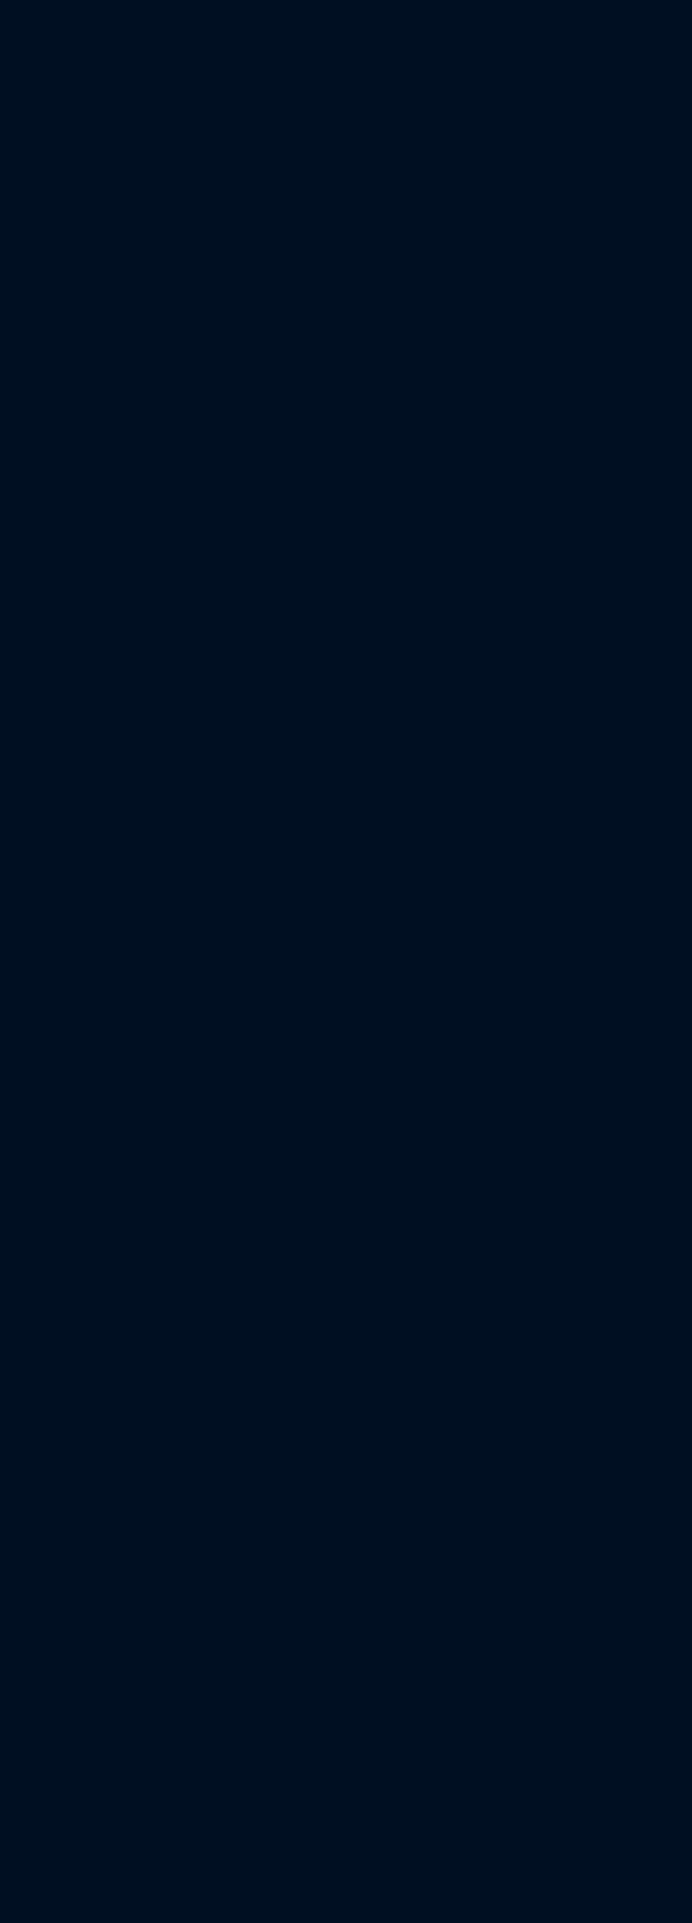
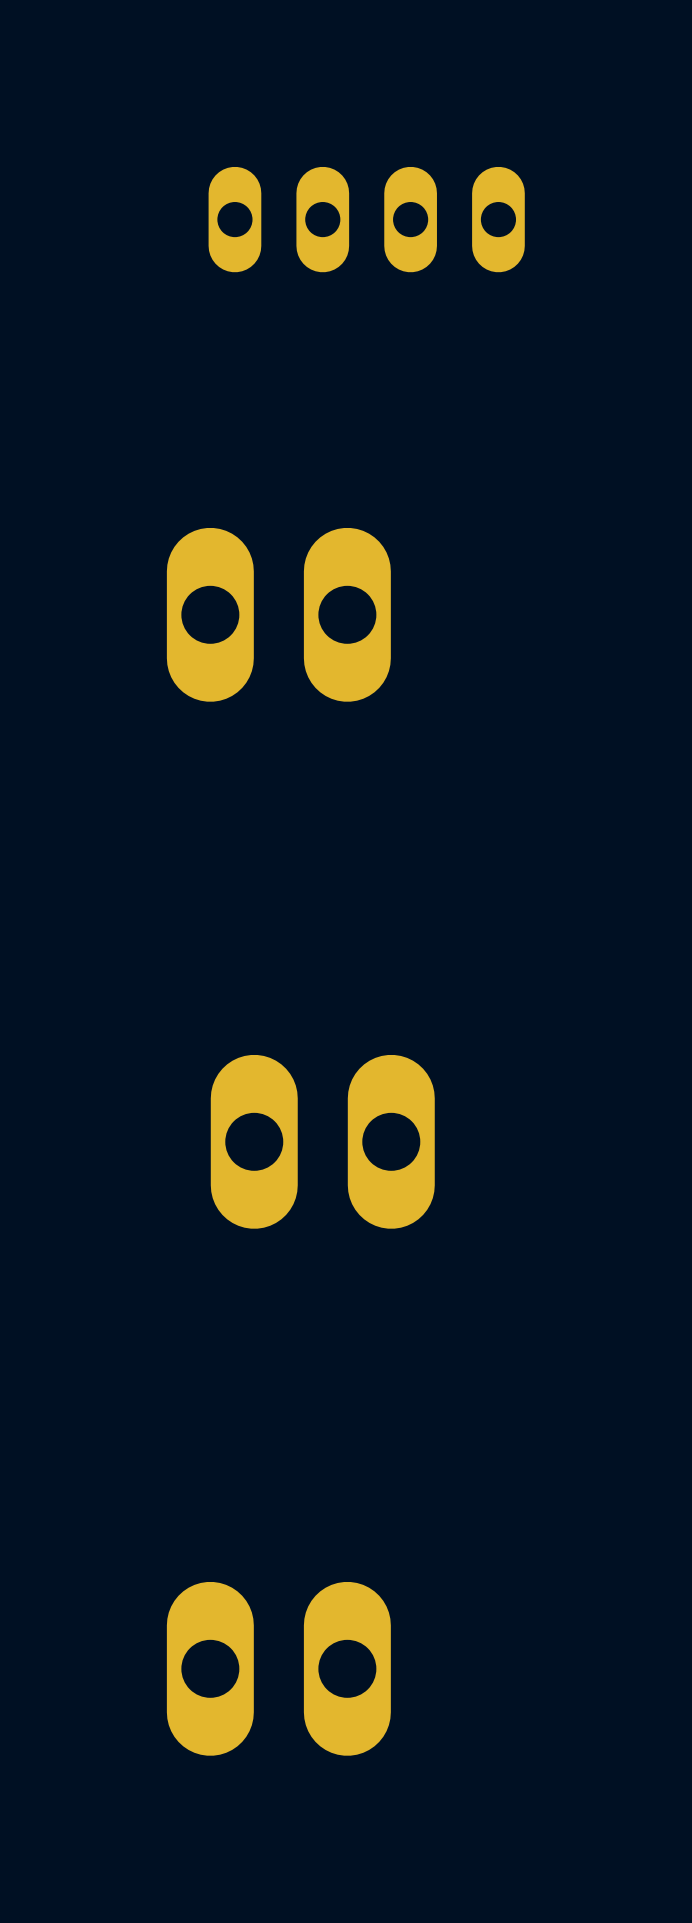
part: none -> (366, 219)
part: none -> (278, 614)
part: none -> (322, 1141)
part: none -> (278, 1668)

